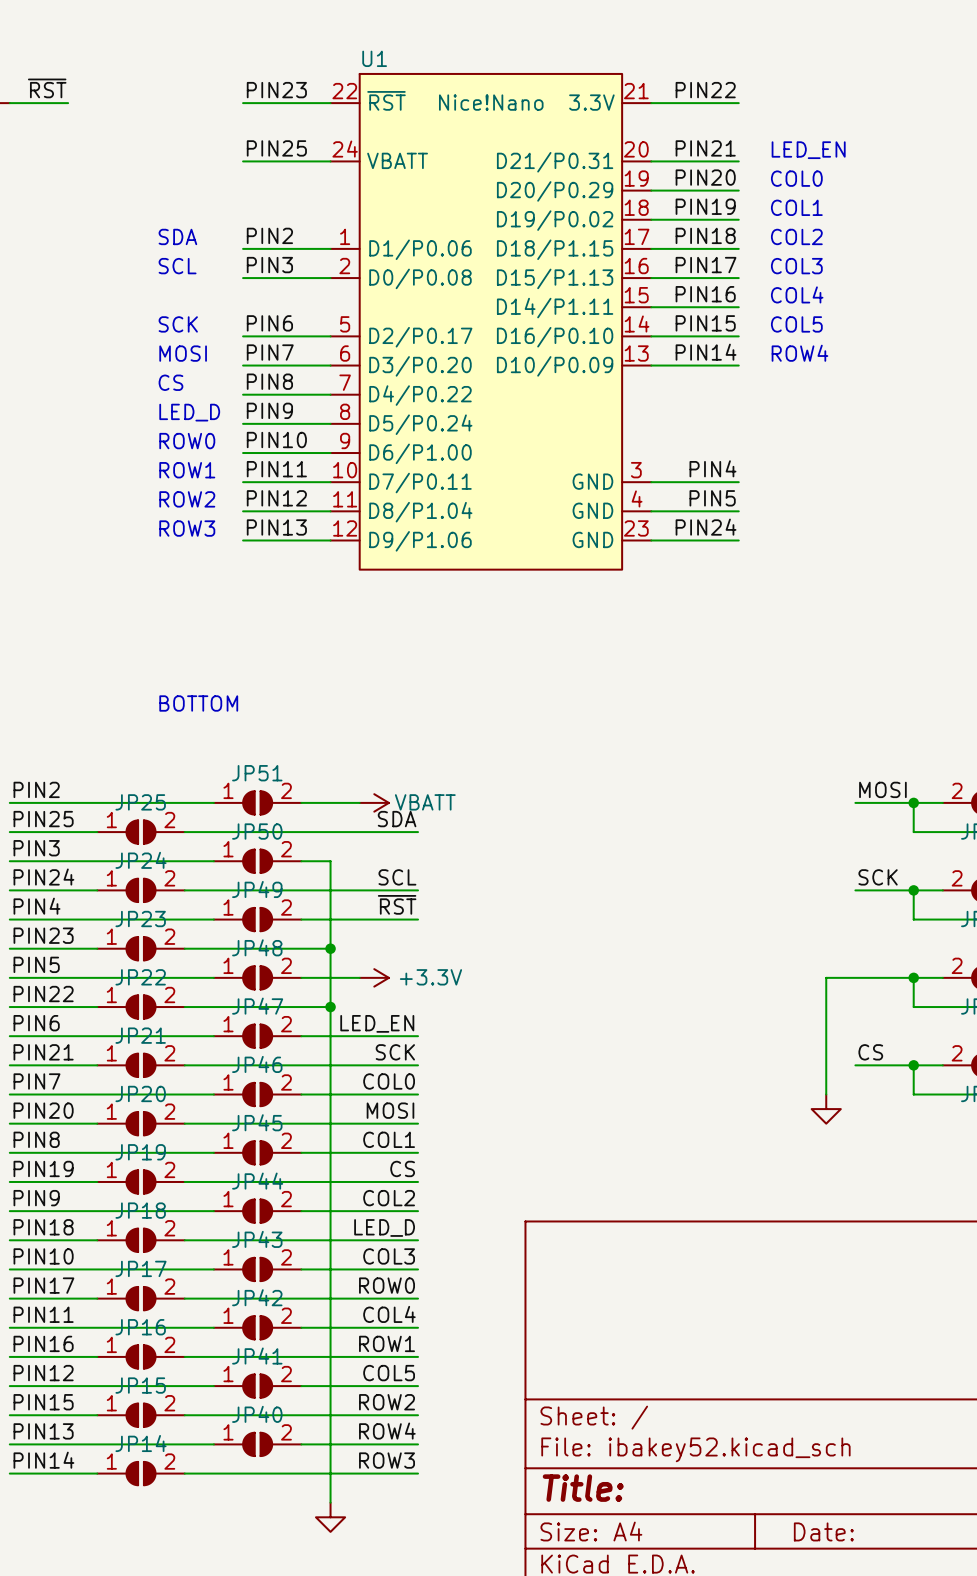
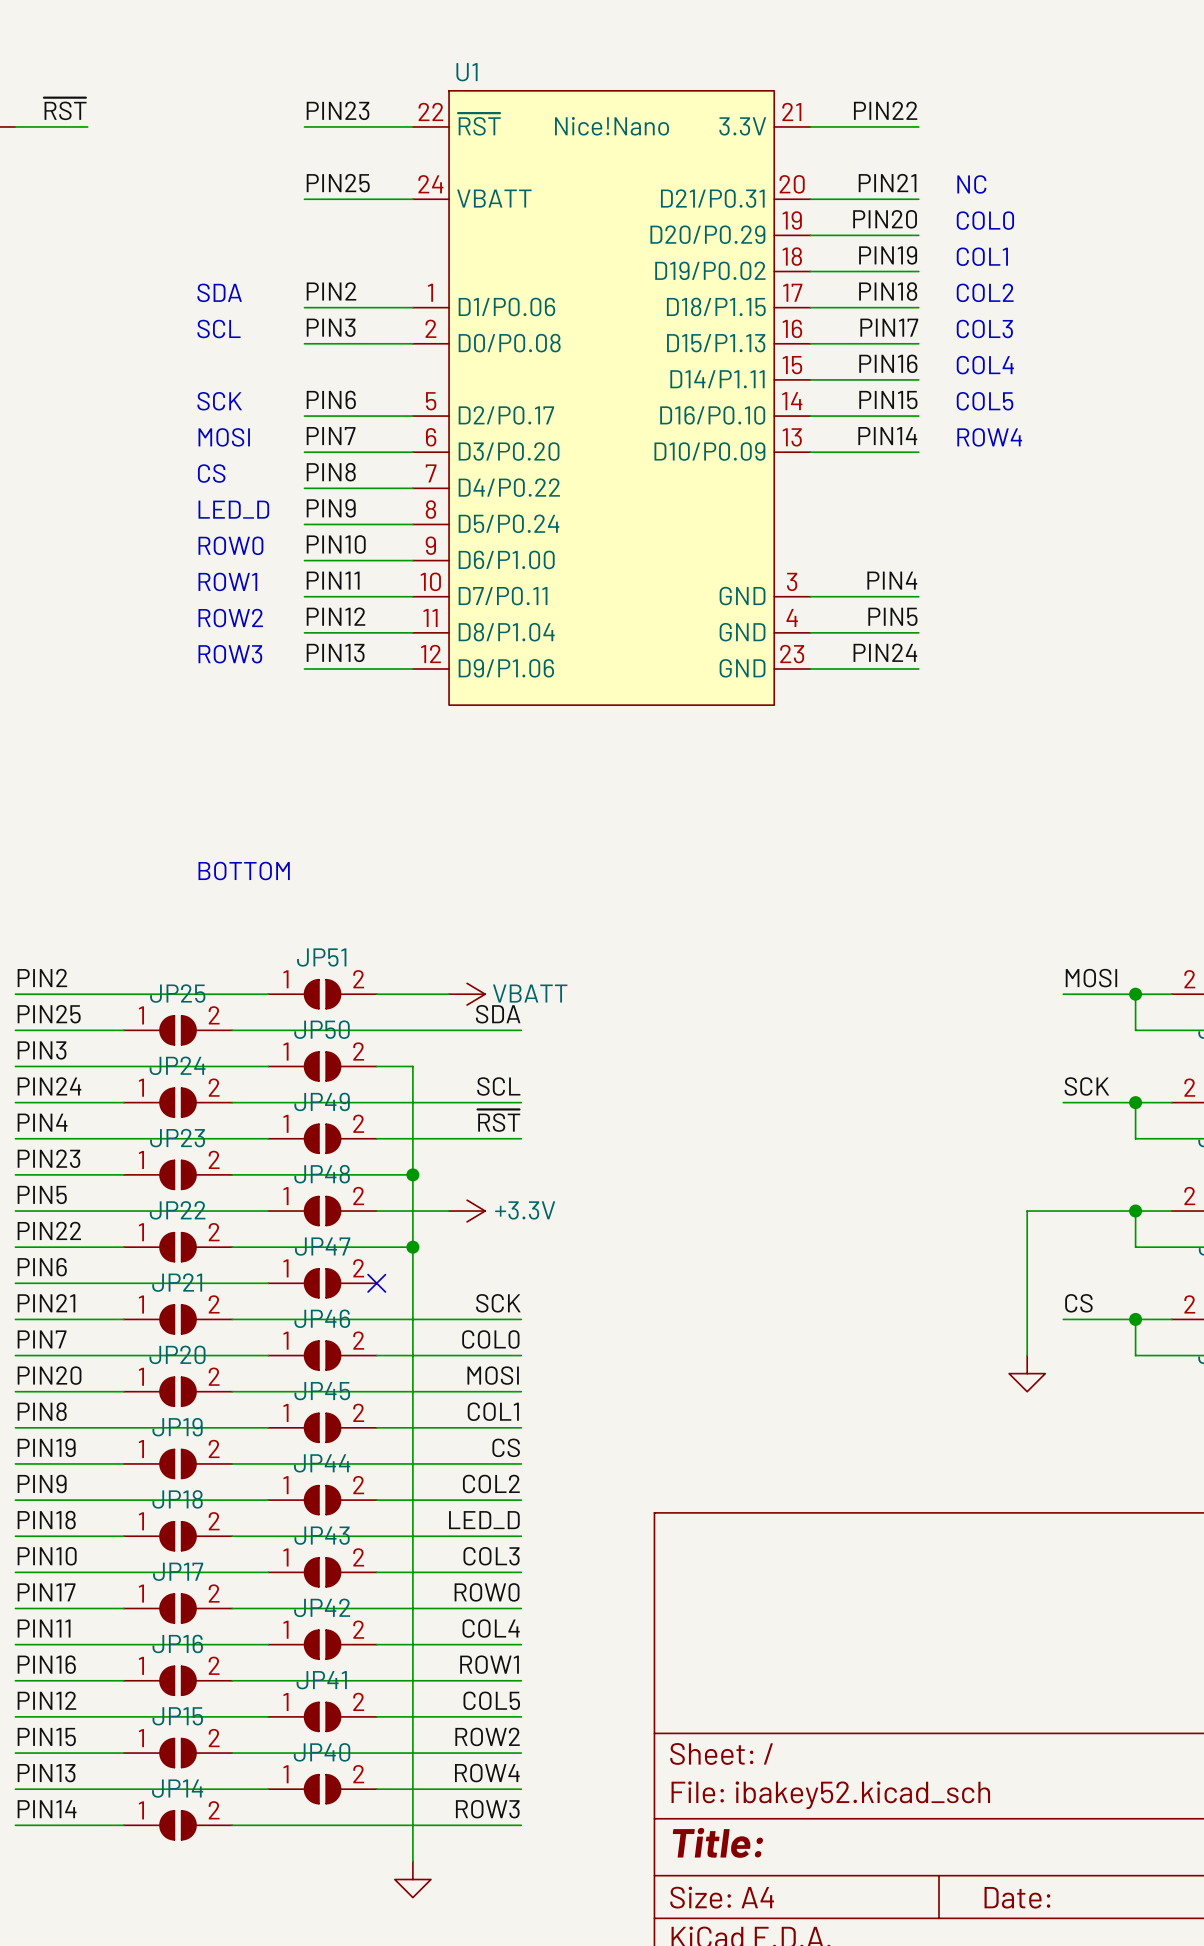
text: LED_EN (808, 150) -> NC (971, 184)
label: LED_EN (377, 1023) -> none
wire: (301, 1036) (418, 1036) -> none
no-connect mark: none -> (376, 1283)

